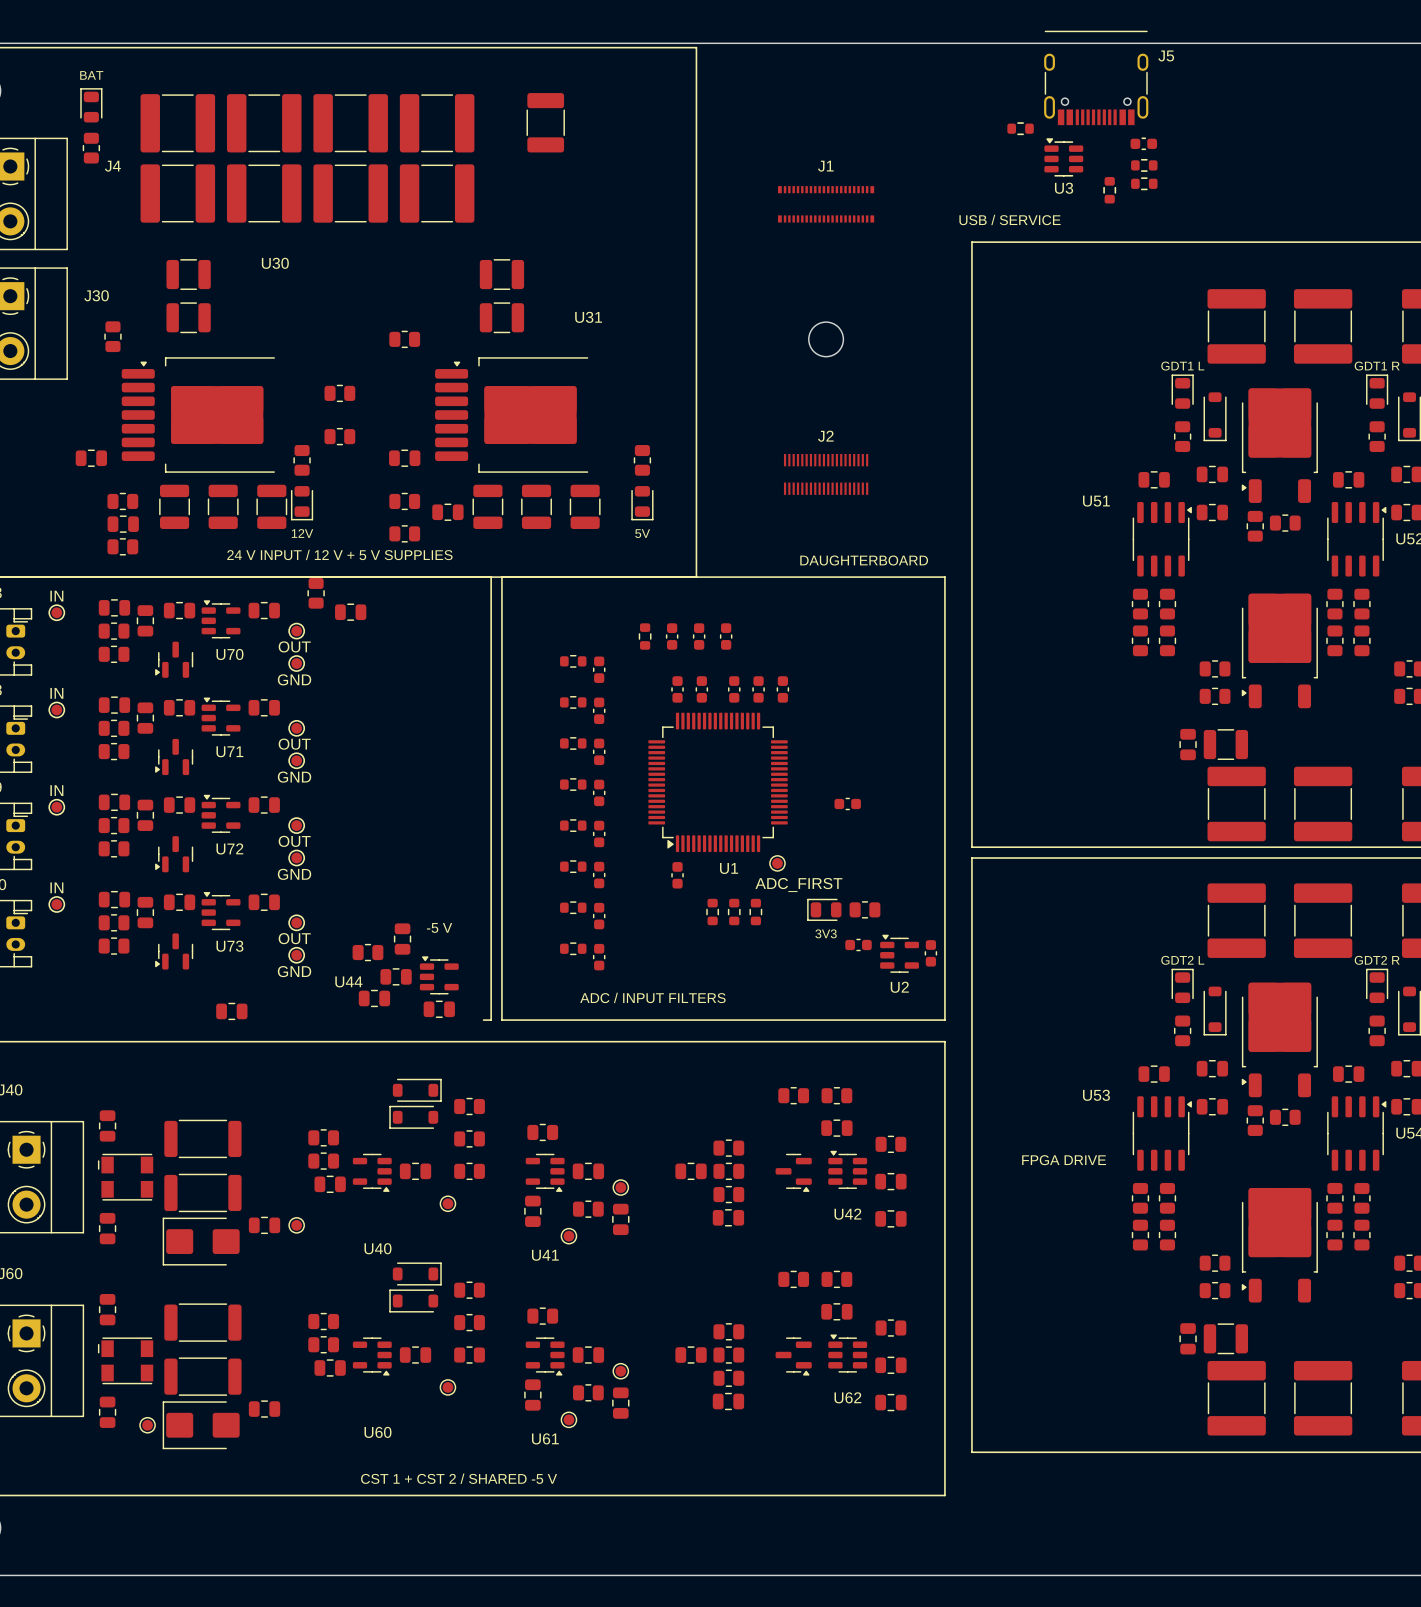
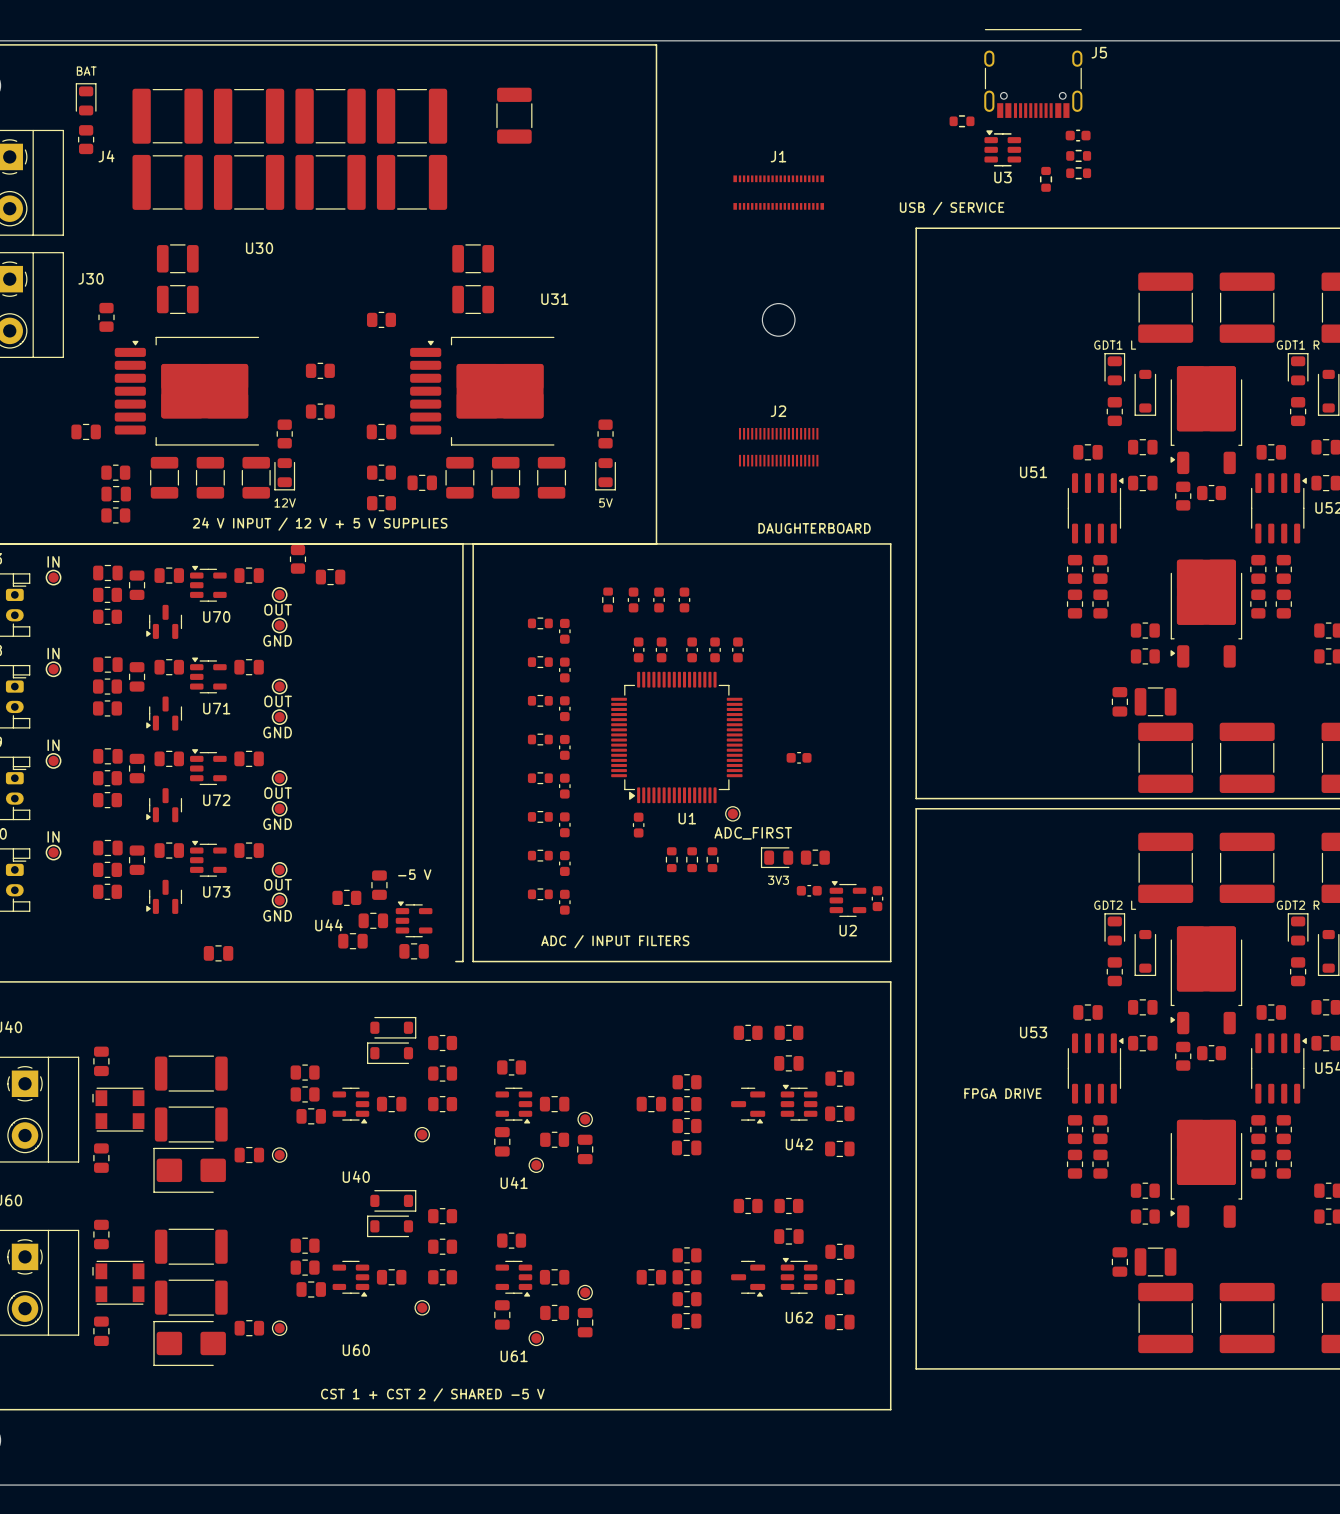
part position: (147, 1425) -> (279, 1328)

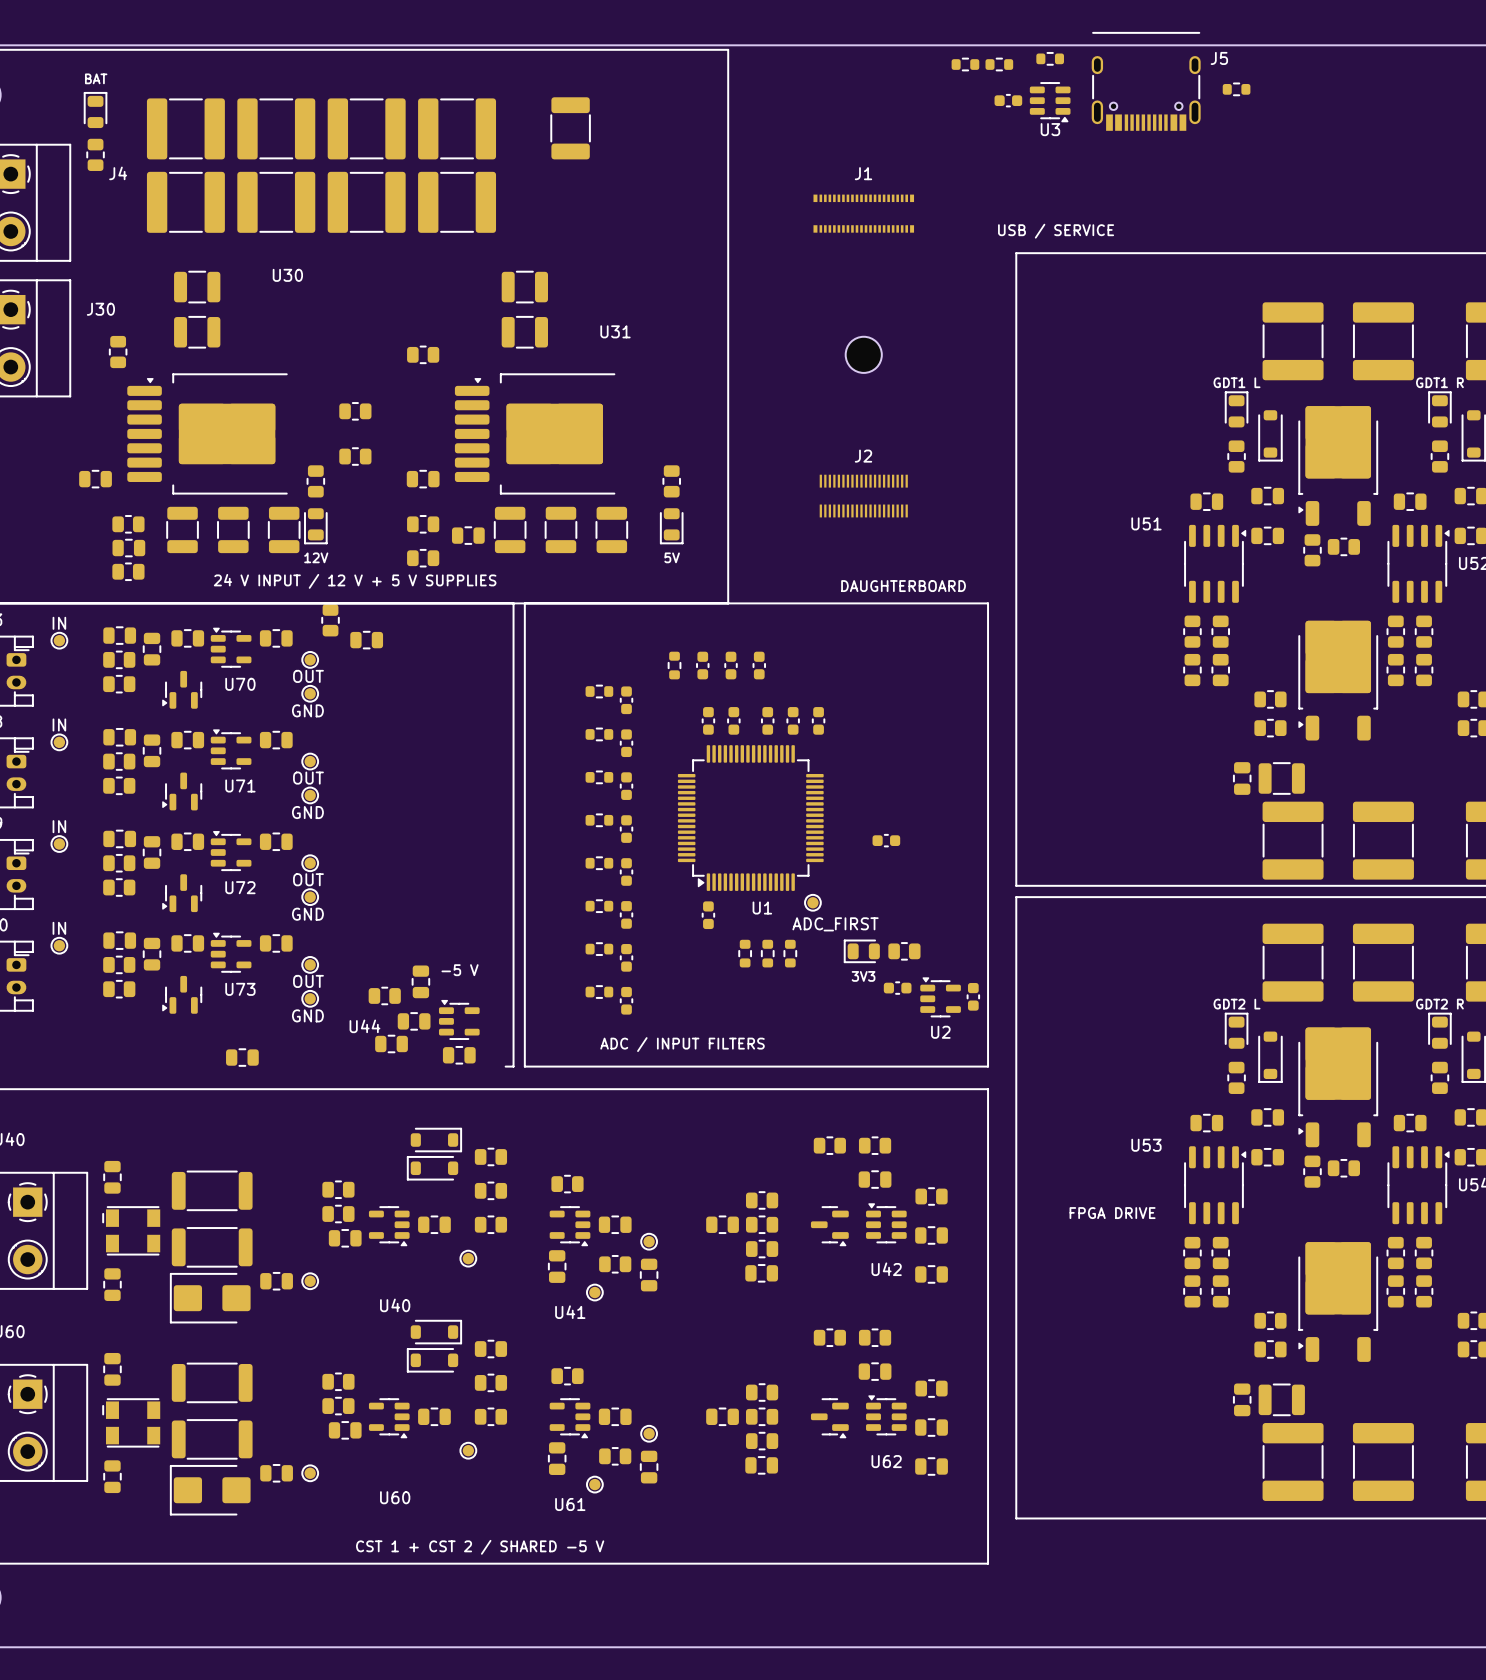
part: none -> (1050, 58)
part: none -> (965, 64)
part: none -> (999, 64)
part: none -> (1236, 89)
part: (962, 121) -> none
part position: (1078, 135) -> (1008, 100)
U3 rotation: 0° (1002, 148) -> 180° (1050, 102)
U3 position: (1002, 148) -> (1050, 102)
part: (1078, 155) -> none
part: (1078, 173) -> none
part: (1046, 179) -> none

